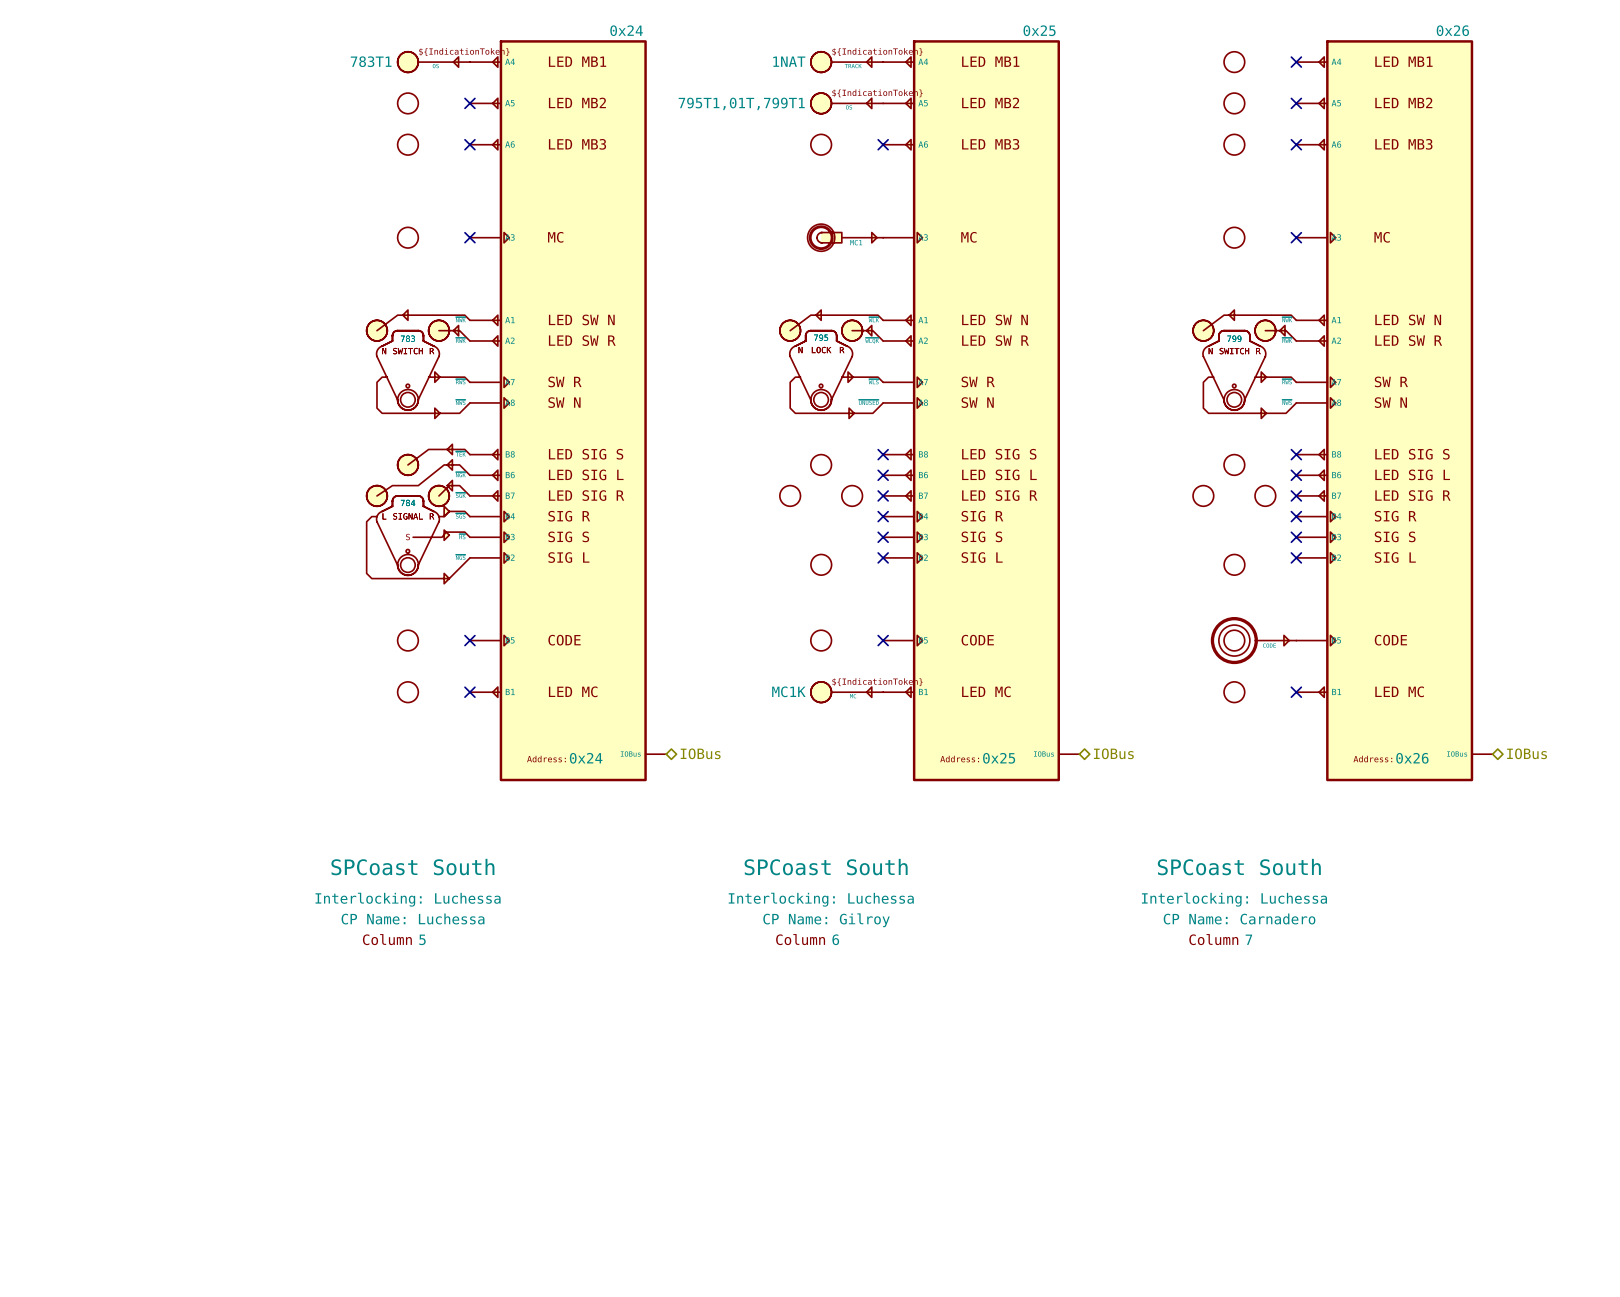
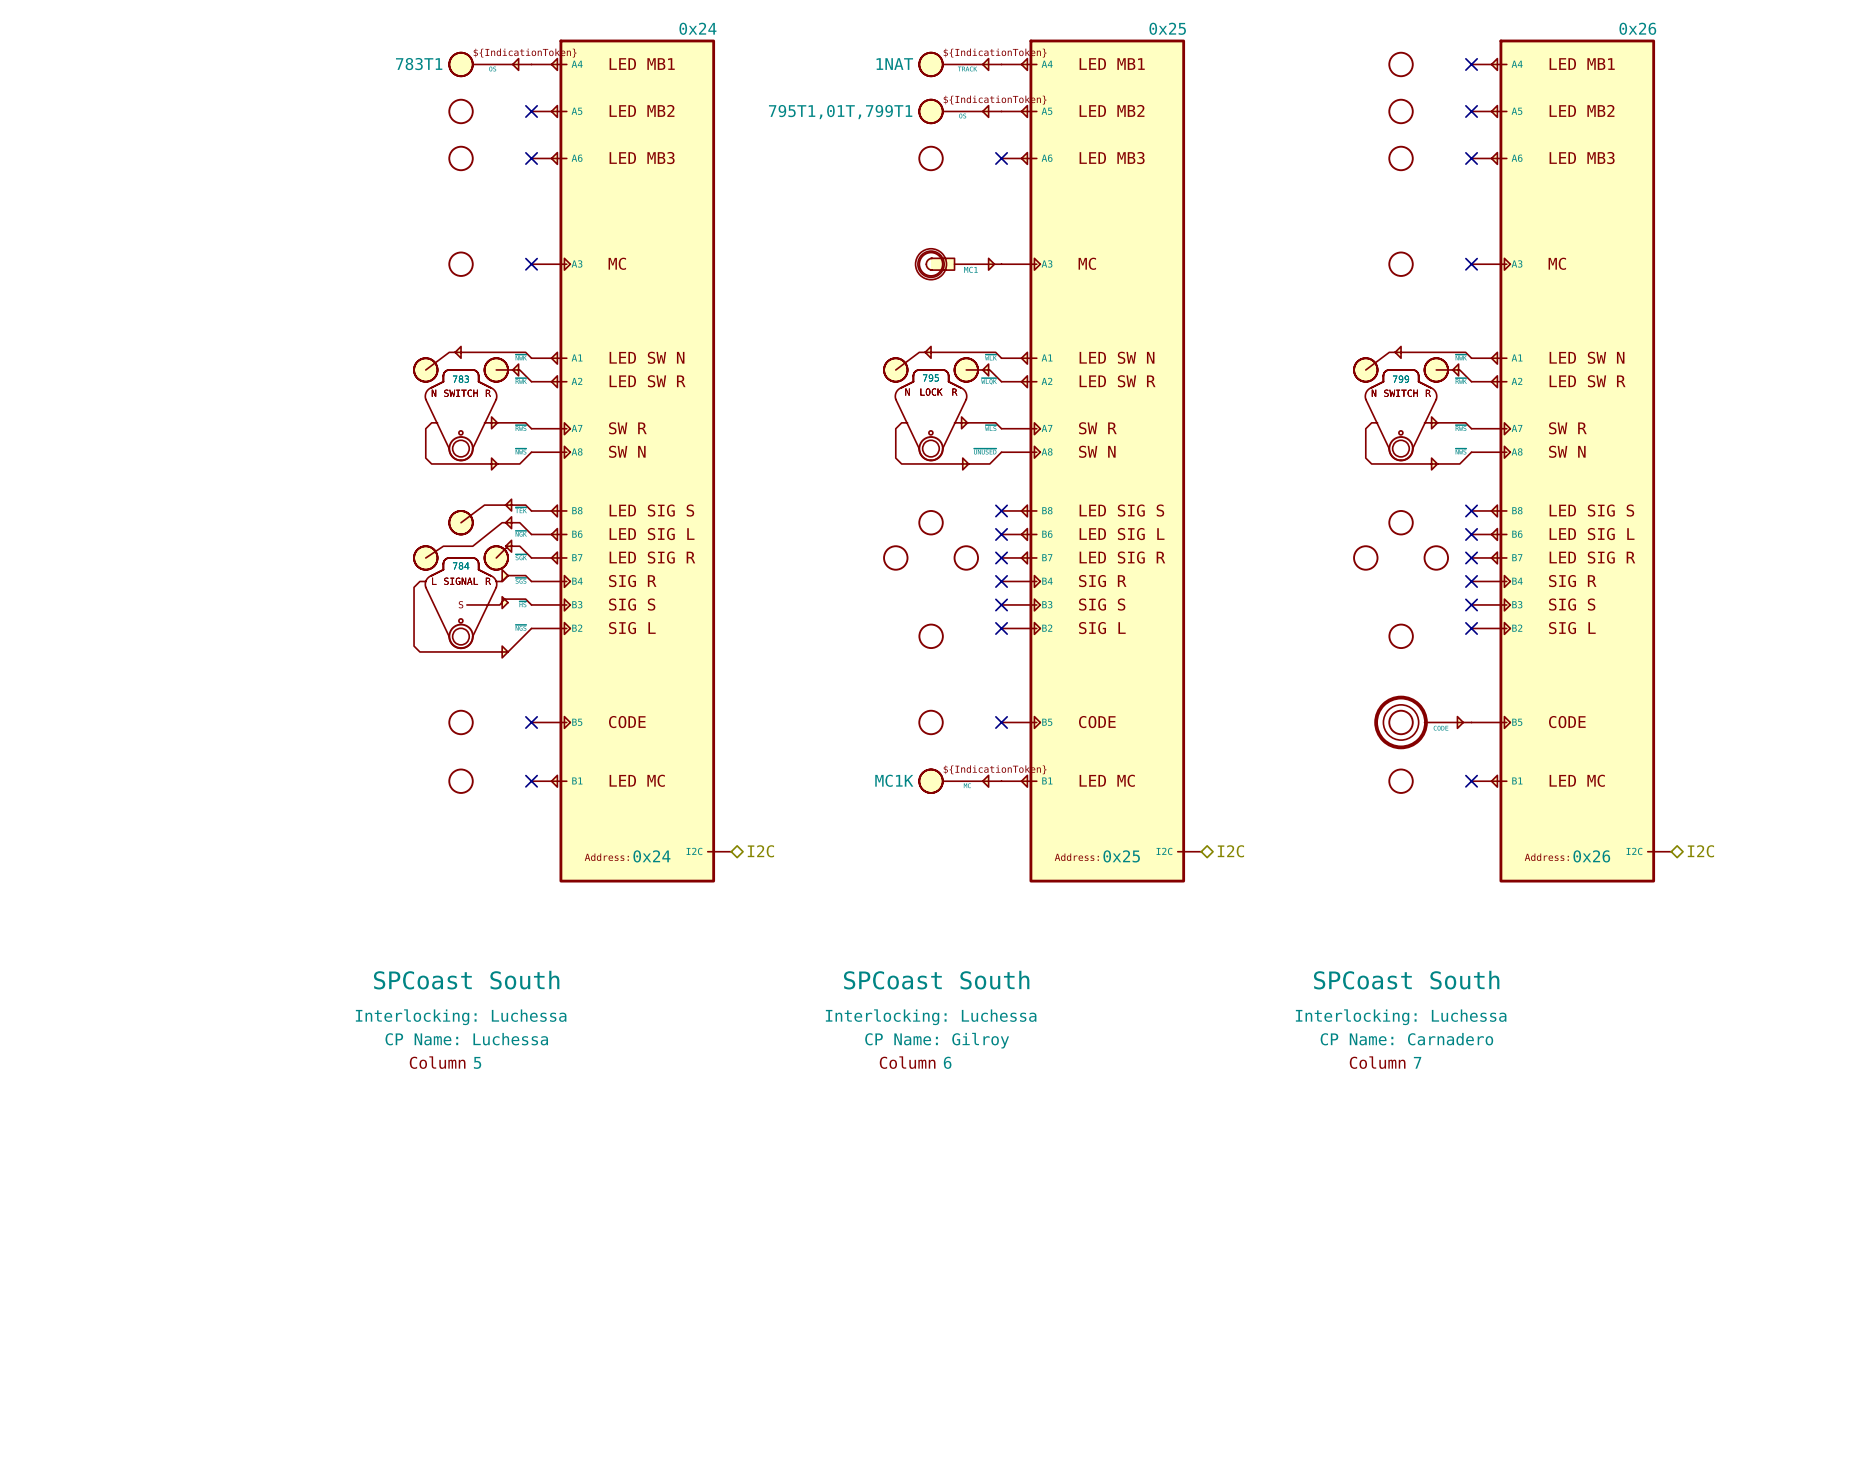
part: none -> 0x24 (631, 461)
part: 0x24 (568, 410) -> none
part: none -> 0x25 (1101, 461)
part: 0x25 (981, 410) -> none
part: none -> 0x26 (1571, 461)
part: 0x26 (1394, 410) -> none
hierarchical label: none -> I2C (760, 851)
hierarchical label: IOBus (700, 753) -> none
hierarchical label: none -> I2C (1230, 851)
hierarchical label: IOBus (1113, 753) -> none
hierarchical label: none -> I2C (1700, 851)
hierarchical label: IOBus (1527, 753) -> none

